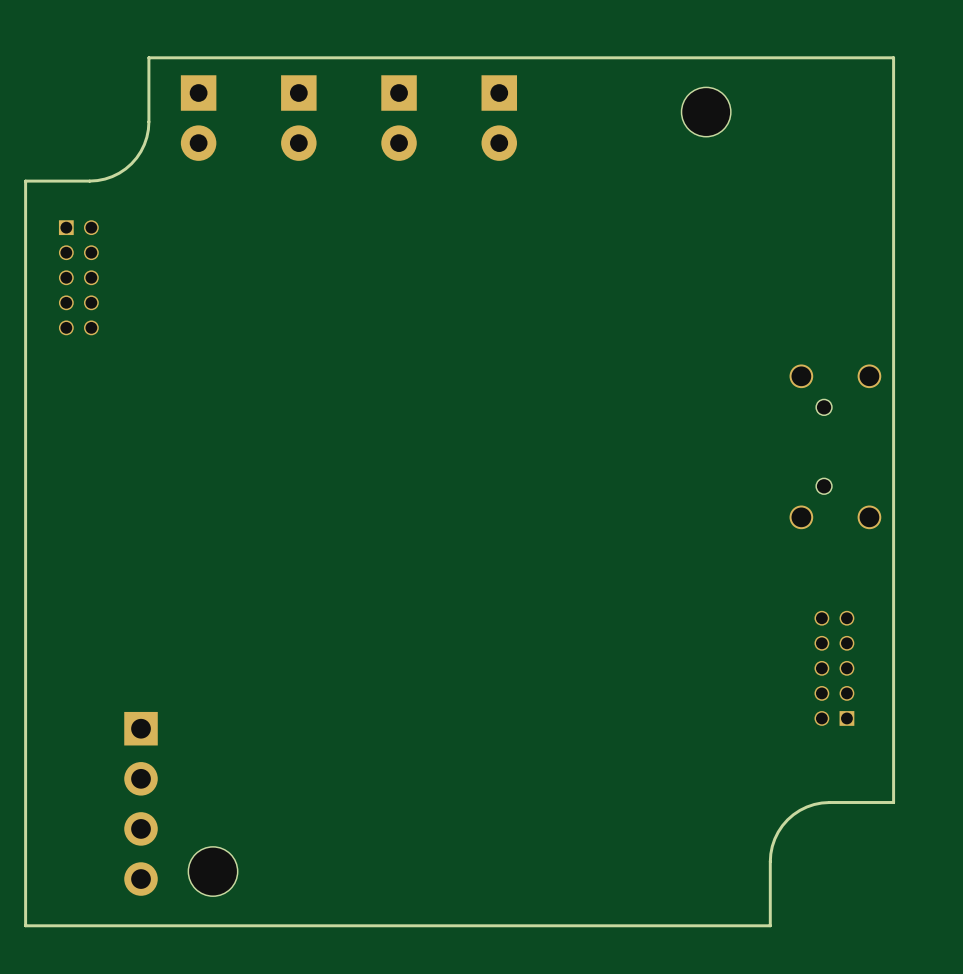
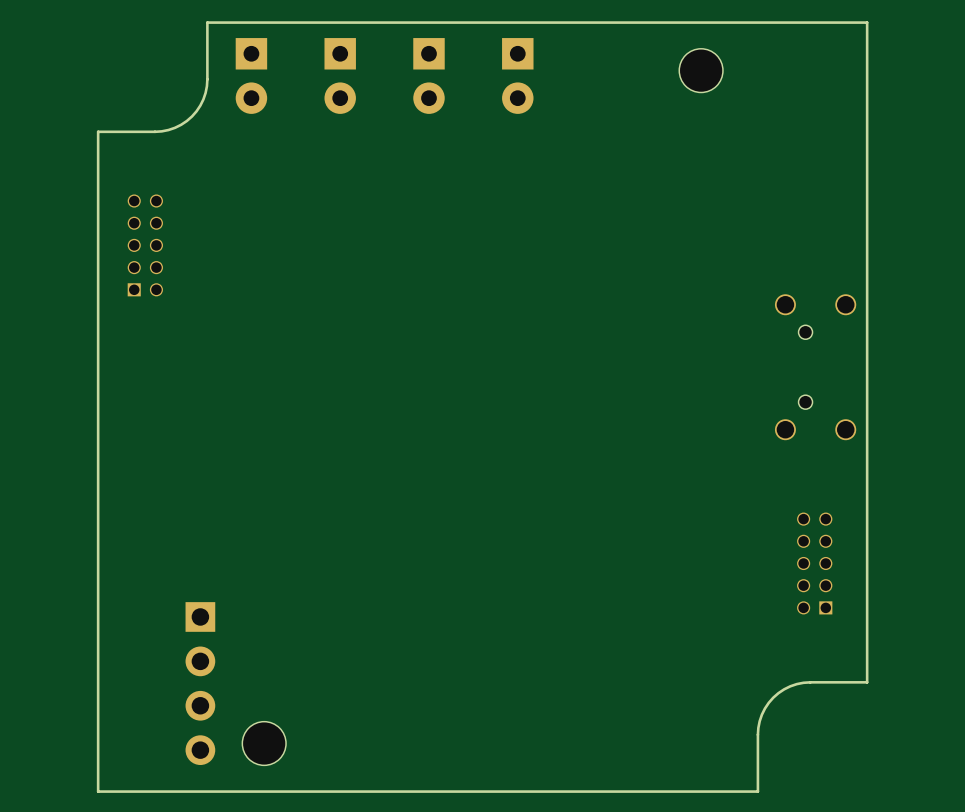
part: (78, 277) -> none
part: none -> (145, 245)

